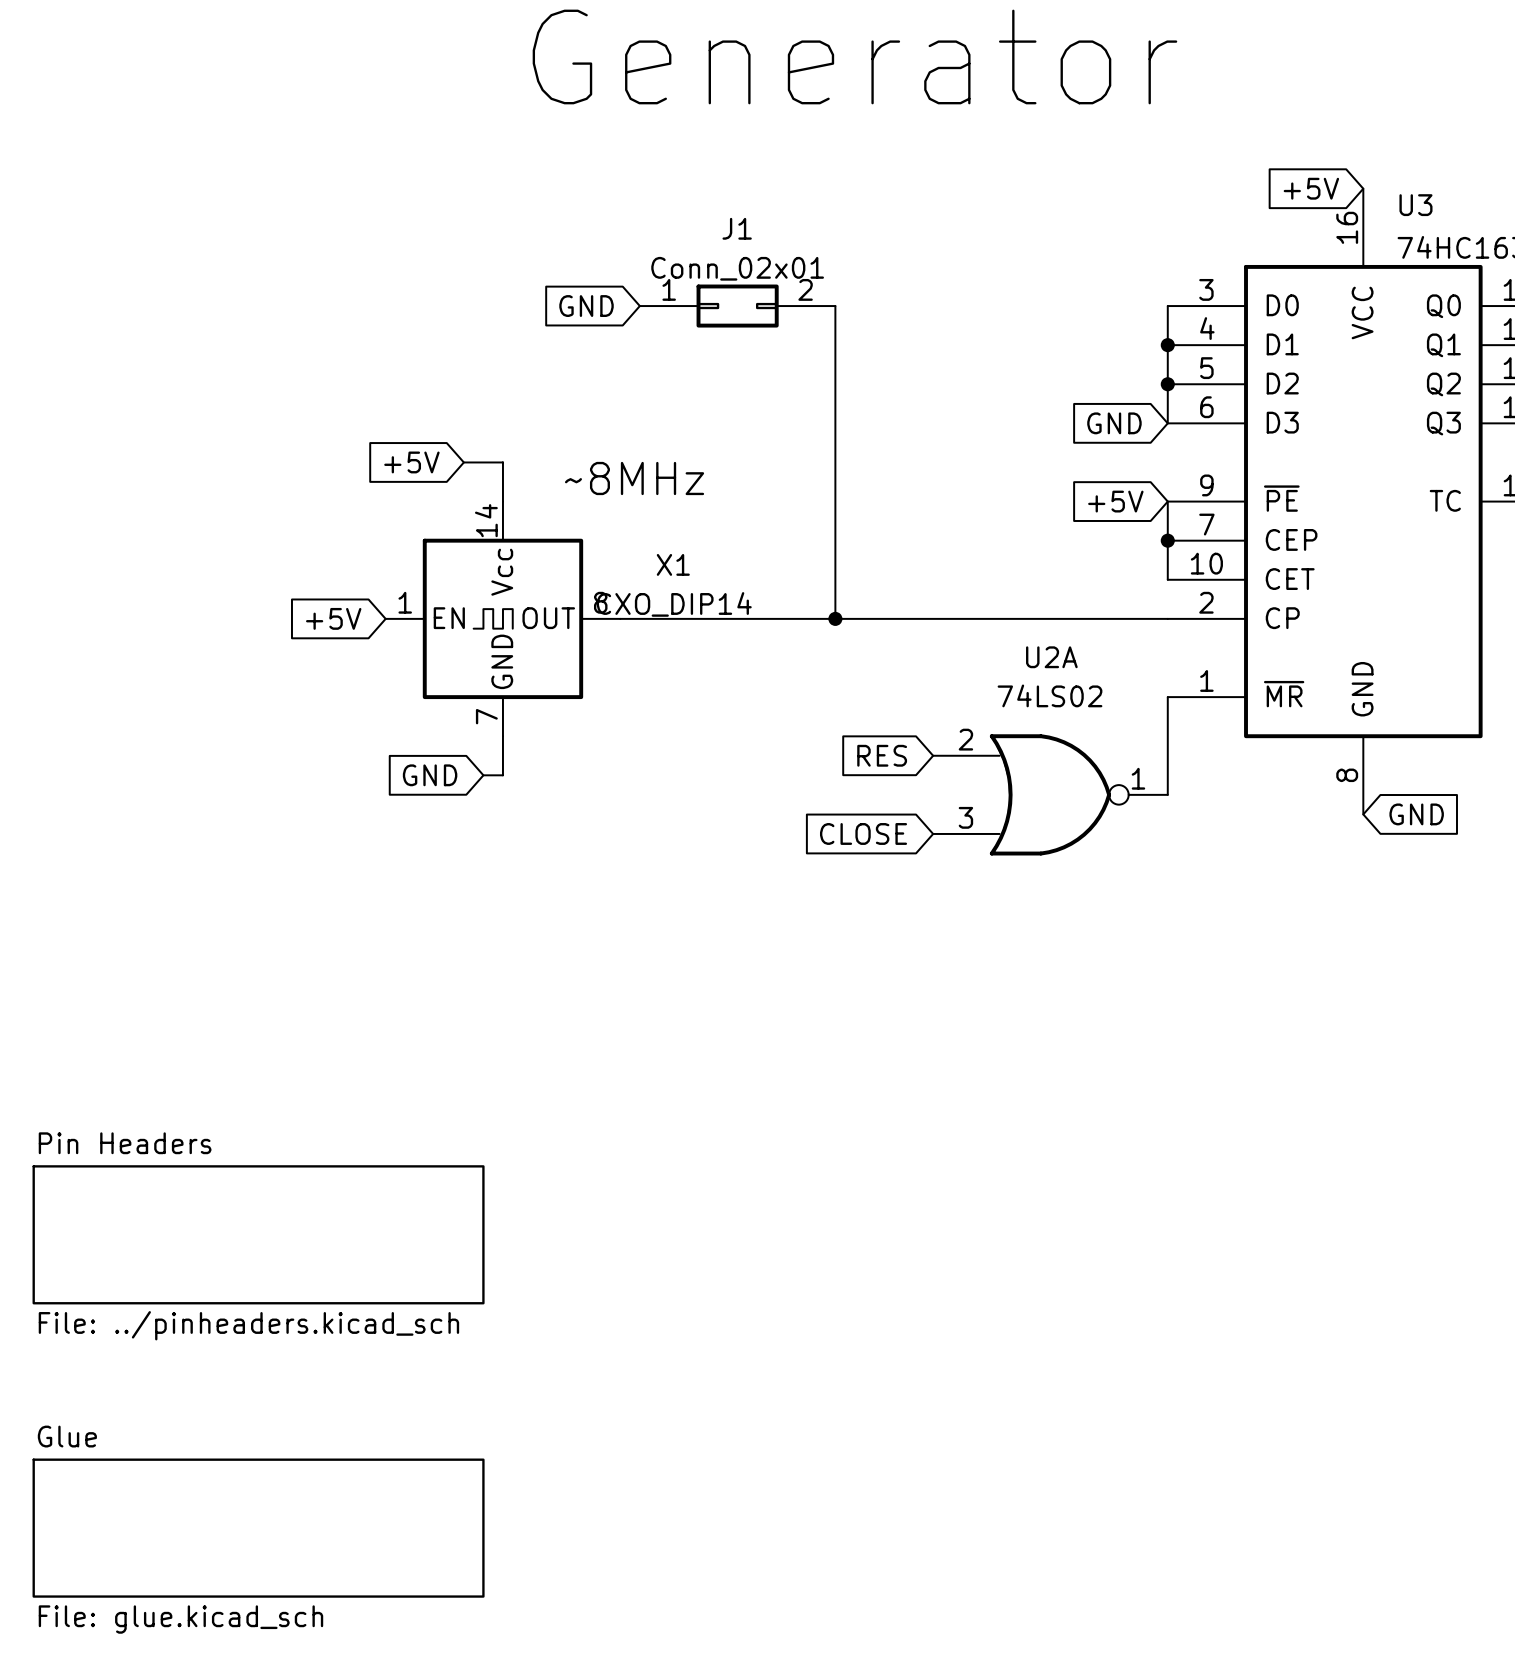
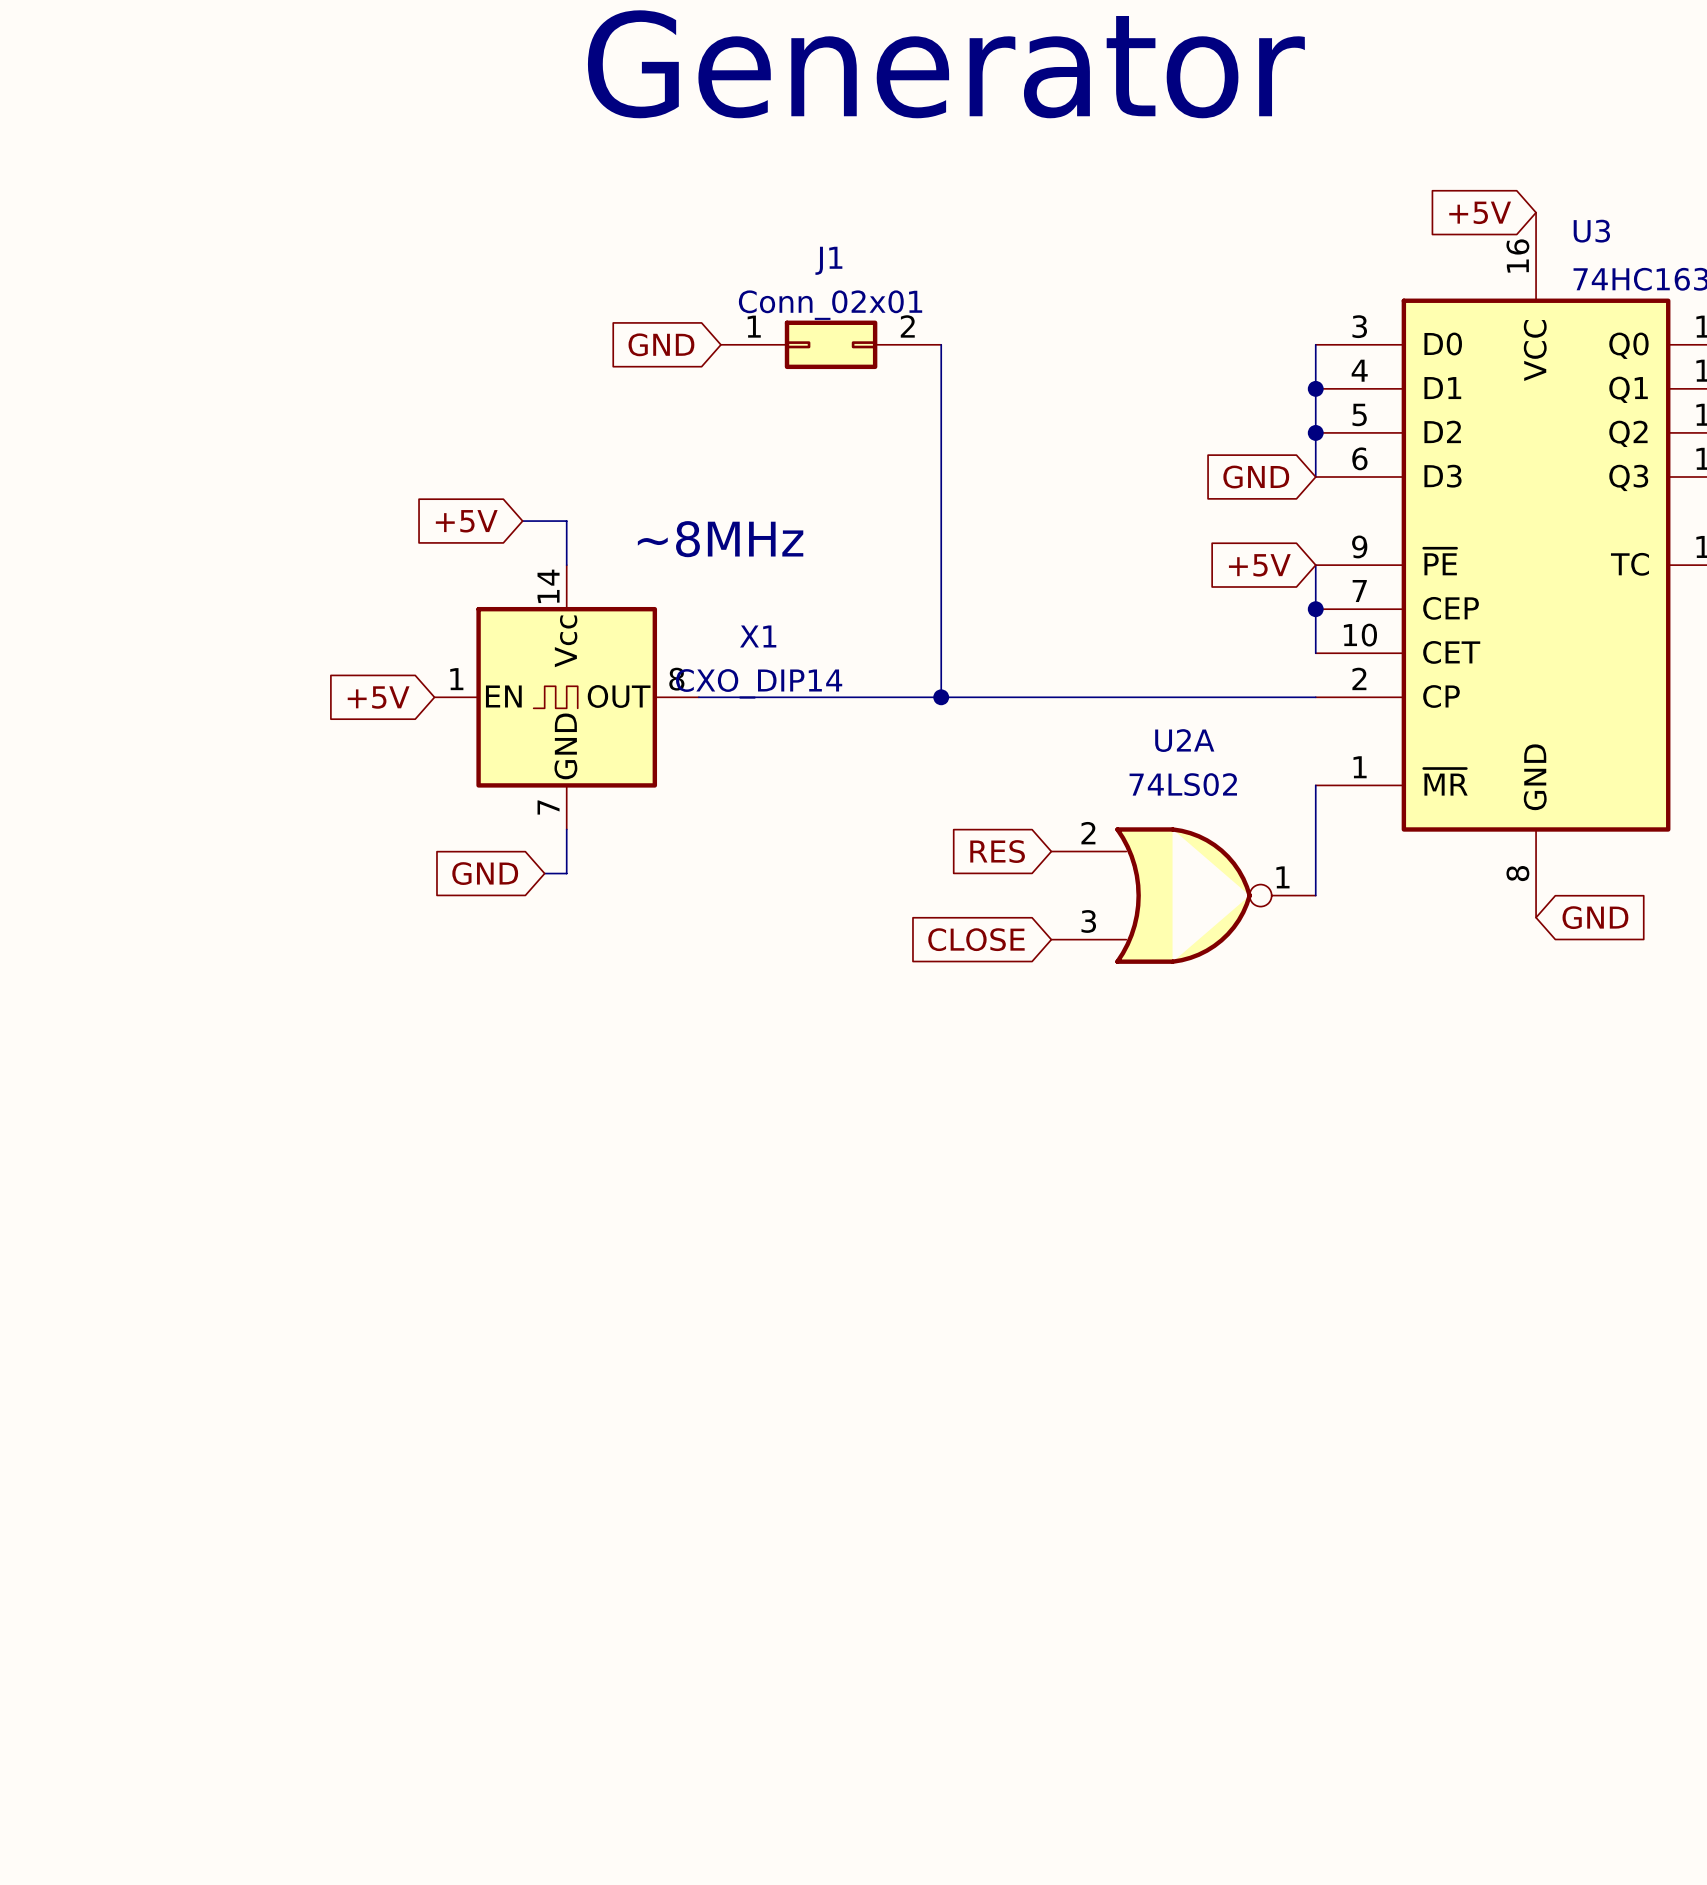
sheet Pin Headers: File: ../pinheaders.kicad_sch (258, 1234) -> none
sheet Glue: File: glue.kicad_sch (258, 1528) -> none

